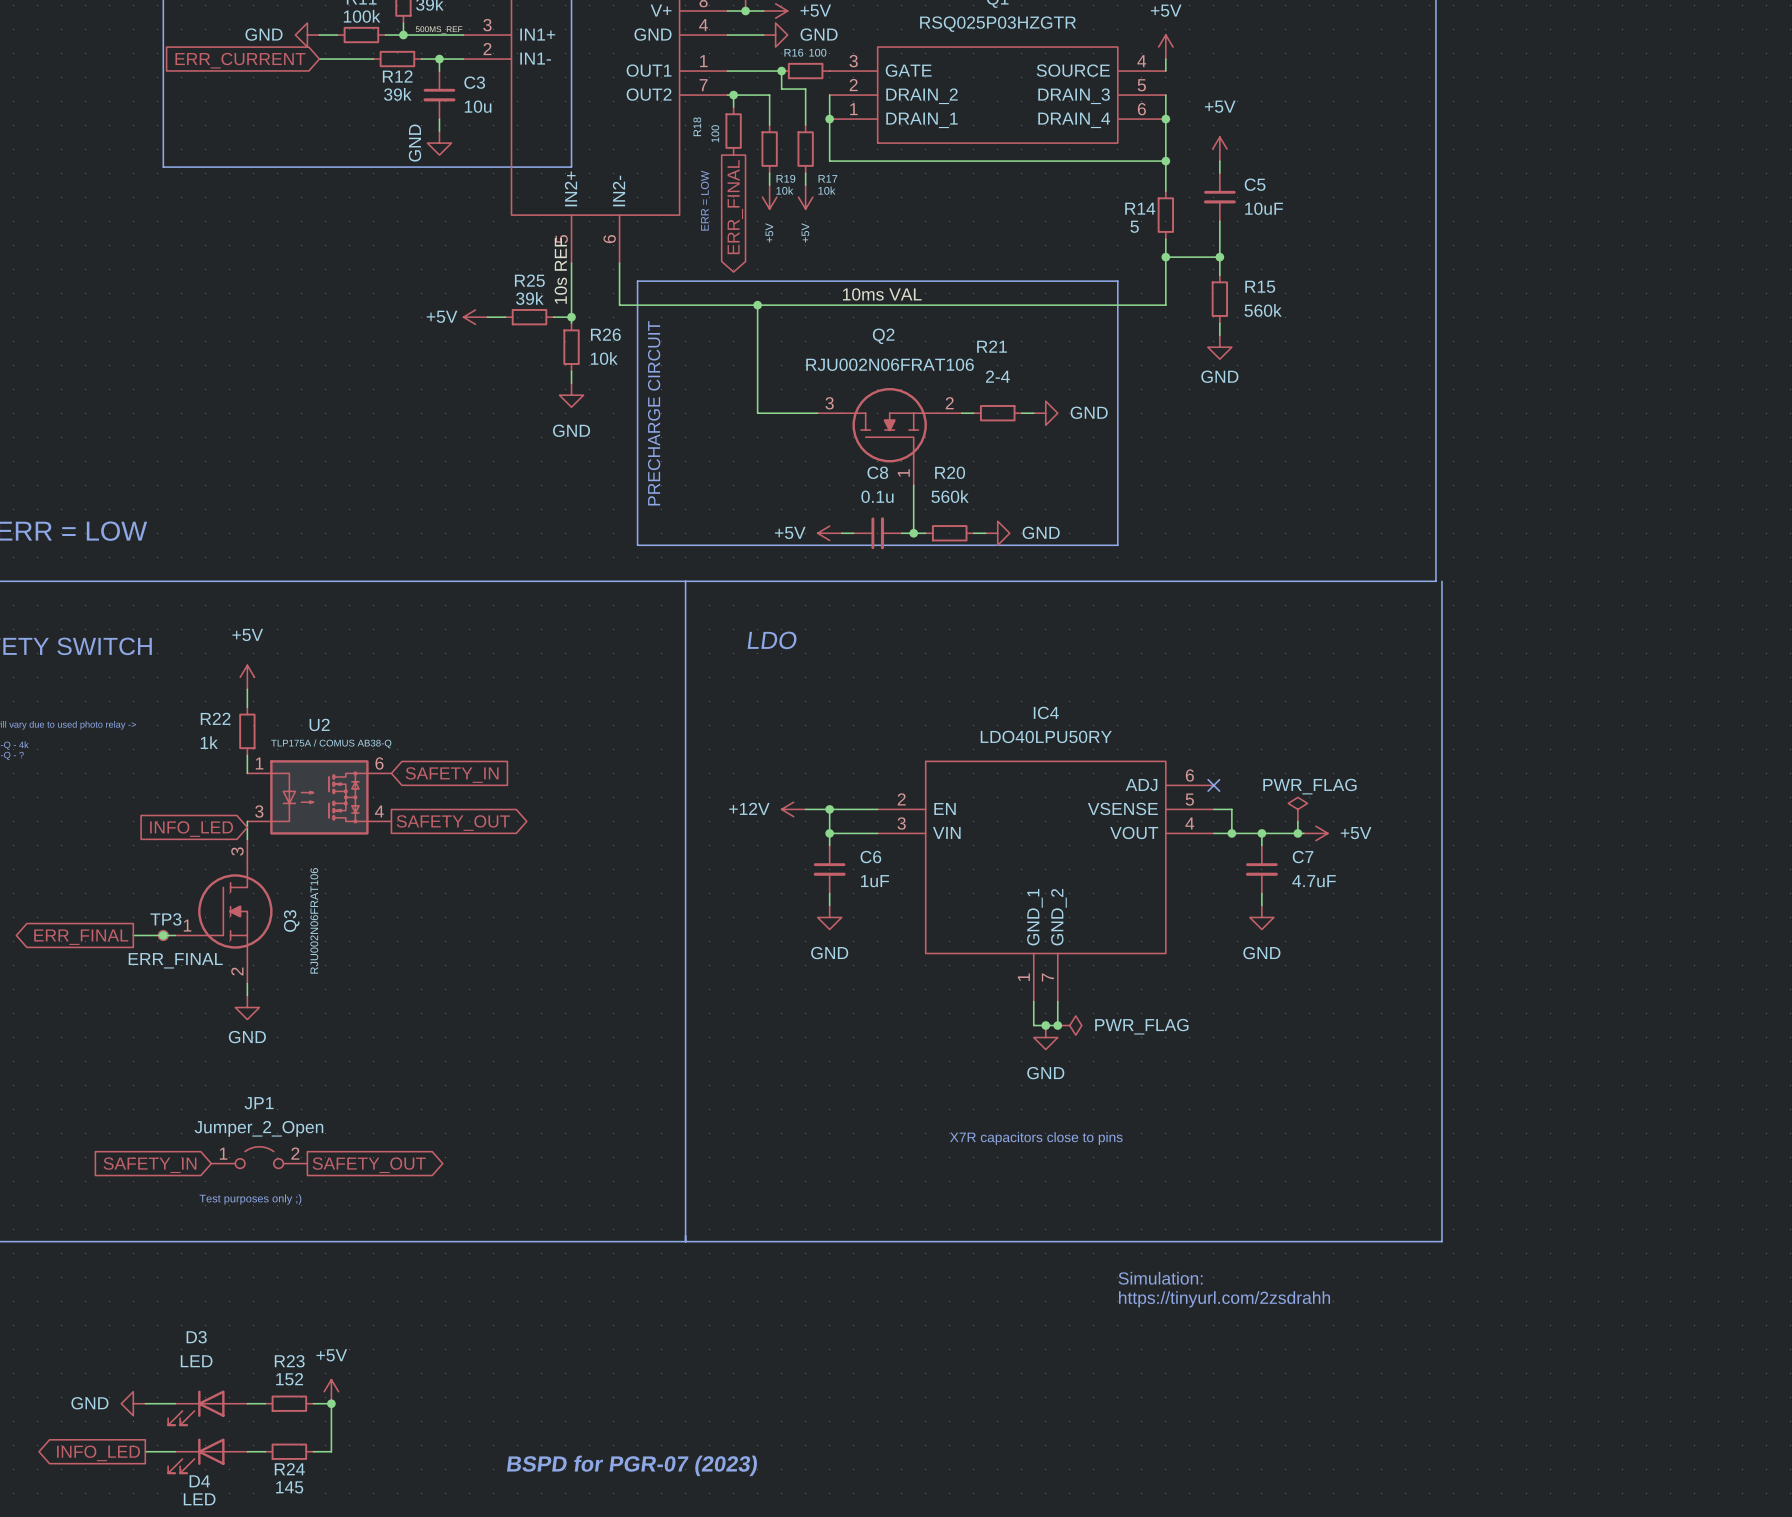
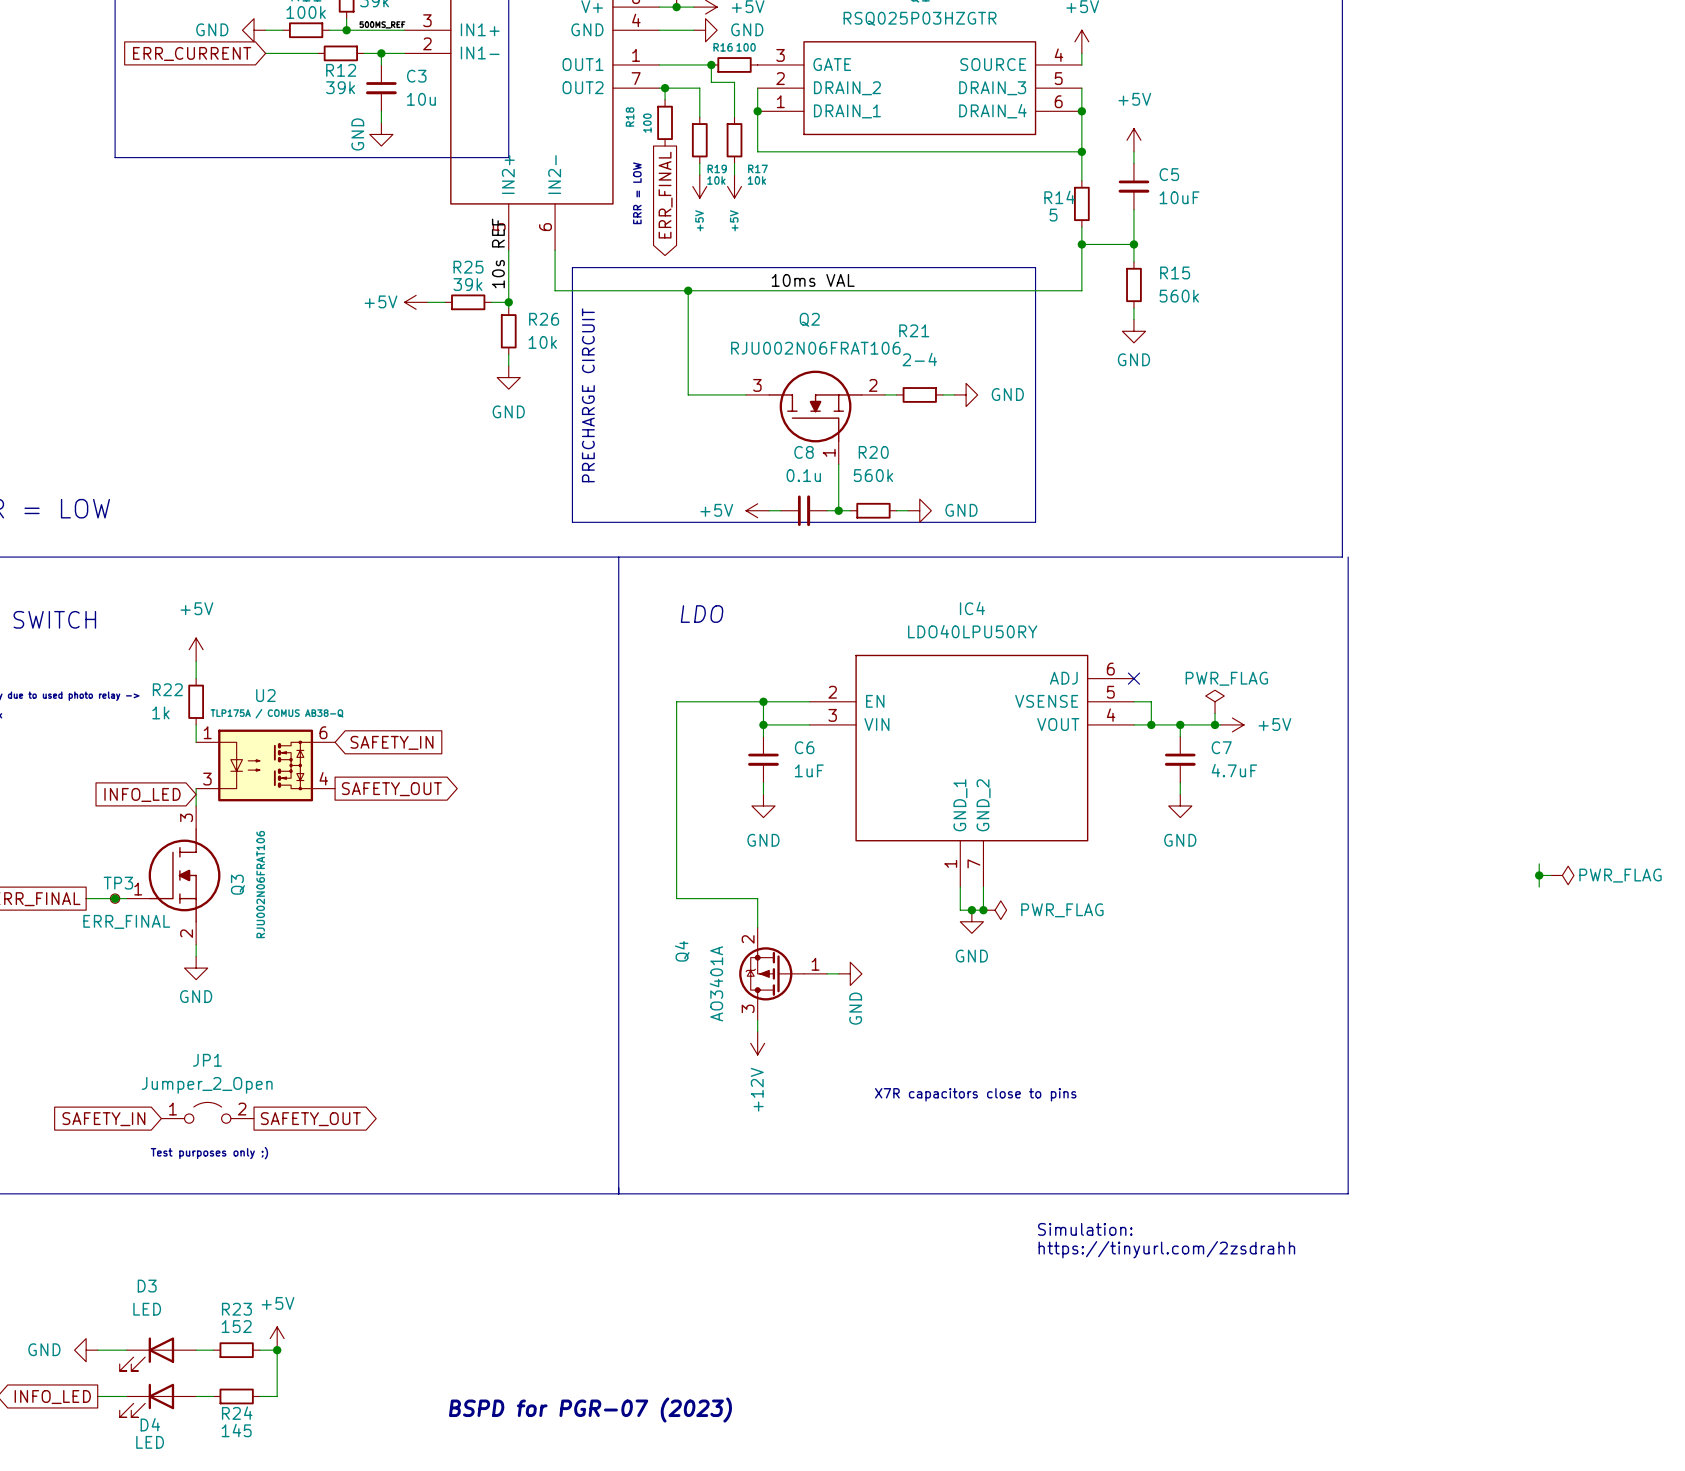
no-connect mark: none -> (1133, 678)
junction: none -> (763, 701)
wire: none -> (809, 701) (676, 701) (676, 898) (757, 898) (757, 927)
junction: none -> (763, 724)
junction: none -> (1151, 724)
junction: none -> (1180, 724)
junction: none -> (1215, 724)
no-connect mark: (1213, 785) -> none
power symbol: +12V (793, 809) -> none
wire: (805, 809) (877, 809) -> none
wire: (829, 809) (829, 845) -> (763, 701) (763, 736)
junction: (829, 809) -> none
wire: (1213, 809) (1231, 809) (1231, 833) -> (1133, 701) (1151, 701) (1151, 724)
power symbol position: PWR_FLAG (1297, 809) -> PWR_FLAG (1215, 701)
wire: (1297, 821) (1297, 833) -> (1215, 713) (1215, 724)
wire: (829, 833) (877, 833) -> (763, 724) (809, 724)
junction: (829, 833) -> none
wire: (1213, 833) (1303, 833) -> (1133, 724) (1220, 724)
junction: (1231, 833) -> none
wire: (1261, 833) (1261, 845) -> (1180, 724) (1180, 736)
junction: (1261, 833) -> none
junction: (1297, 833) -> none
power symbol position: +5V (1315, 833) -> +5V (1232, 724)
power symbol: none -> GND (763, 805)
C6 position: (829, 869) -> (763, 759)
C7 position: (1261, 869) -> (1180, 759)
IC4 position: (1045, 881) -> (971, 770)
wire: (829, 893) (829, 905) -> (763, 782) (763, 794)
wire: (1261, 893) (1261, 905) -> (1180, 782) (1180, 794)
wire: none -> (1539, 863) (1539, 887)
wire: none -> (1539, 875) (1550, 875)
junction: none -> (1539, 875)
power symbol: none -> PWR_FLAG (1562, 875)
power symbol: GND (829, 917) -> none
power symbol position: GND (1261, 917) -> GND (1180, 805)
junction: none -> (971, 910)
junction: none -> (983, 910)
power symbol: none -> GND (971, 921)
wire: (1033, 1001) (1033, 1025) (1057, 1025) (1057, 1001) -> (960, 887) (960, 910) (983, 910) (983, 887)
Q4: none -> AO3401A (783, 973)
wire: none -> (827, 973) (838, 973)
power symbol: none -> GND (850, 973)
junction: (1045, 1025) -> none
junction: (1057, 1025) -> none
power symbol position: PWR_FLAG (1069, 1025) -> PWR_FLAG (995, 910)
power symbol: GND (1045, 1037) -> none
wire: none -> (757, 1020) (757, 1031)
power symbol: none -> +12V (757, 1043)

